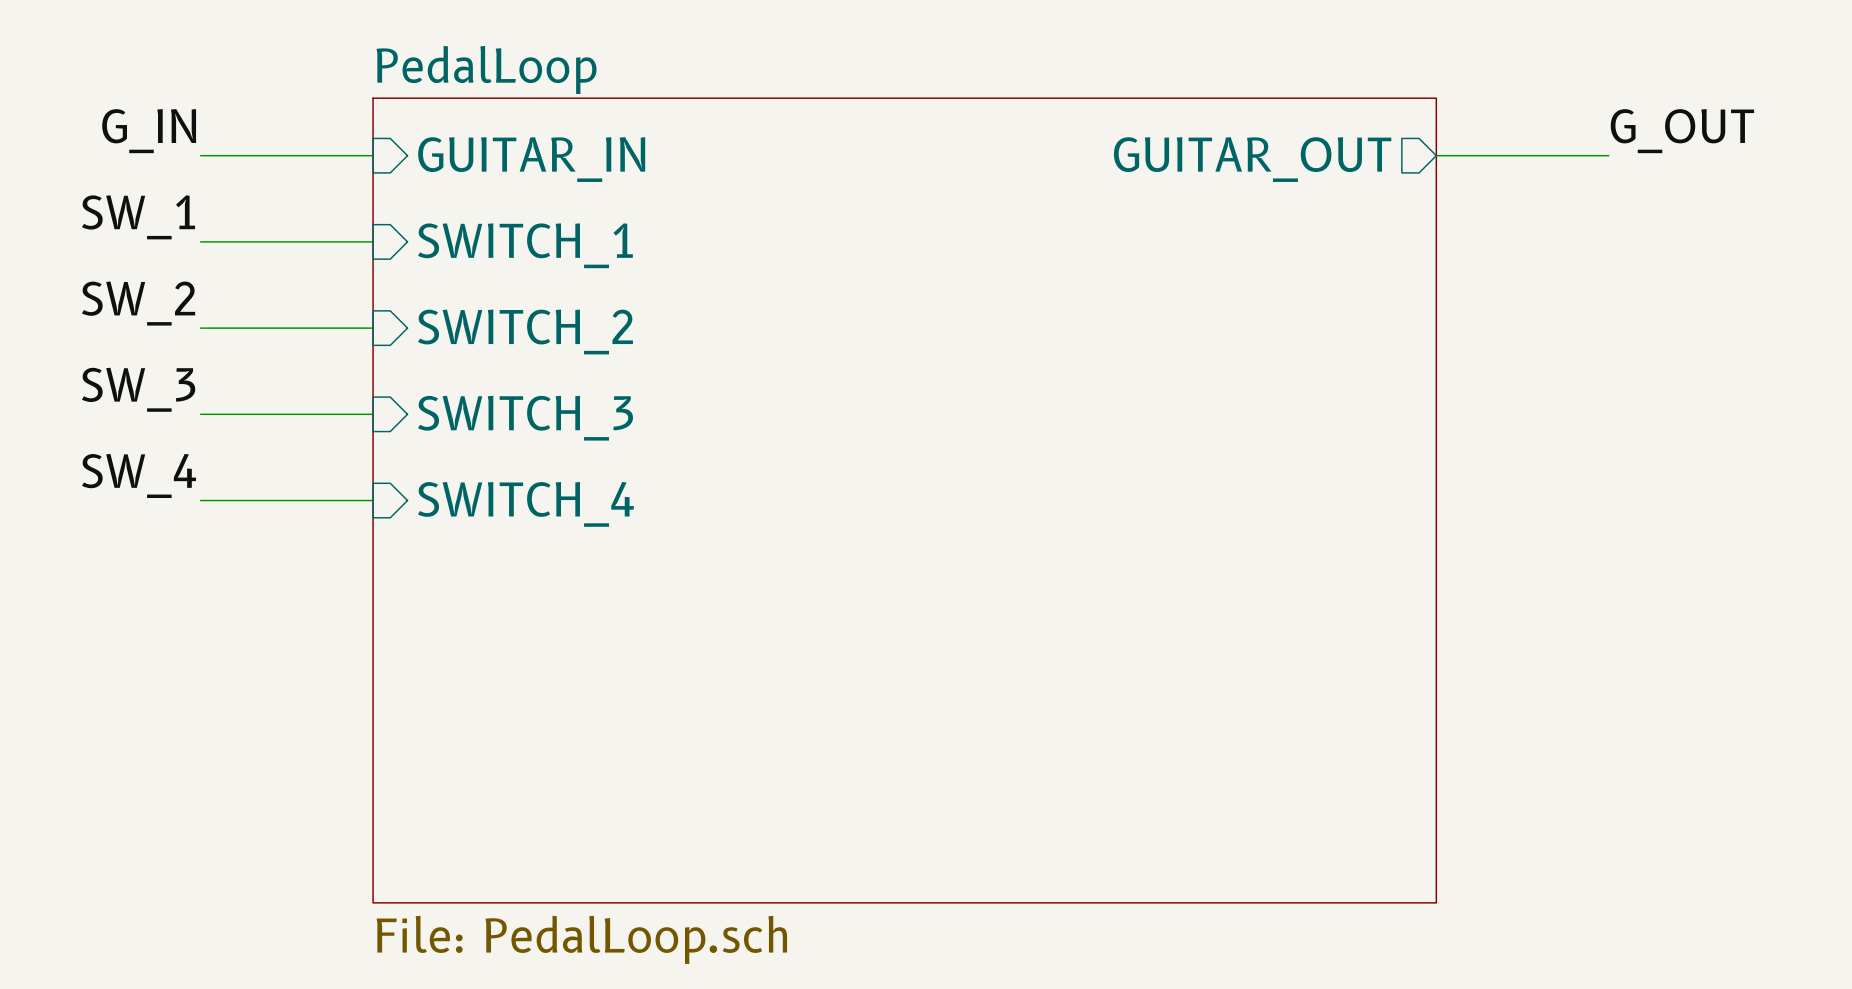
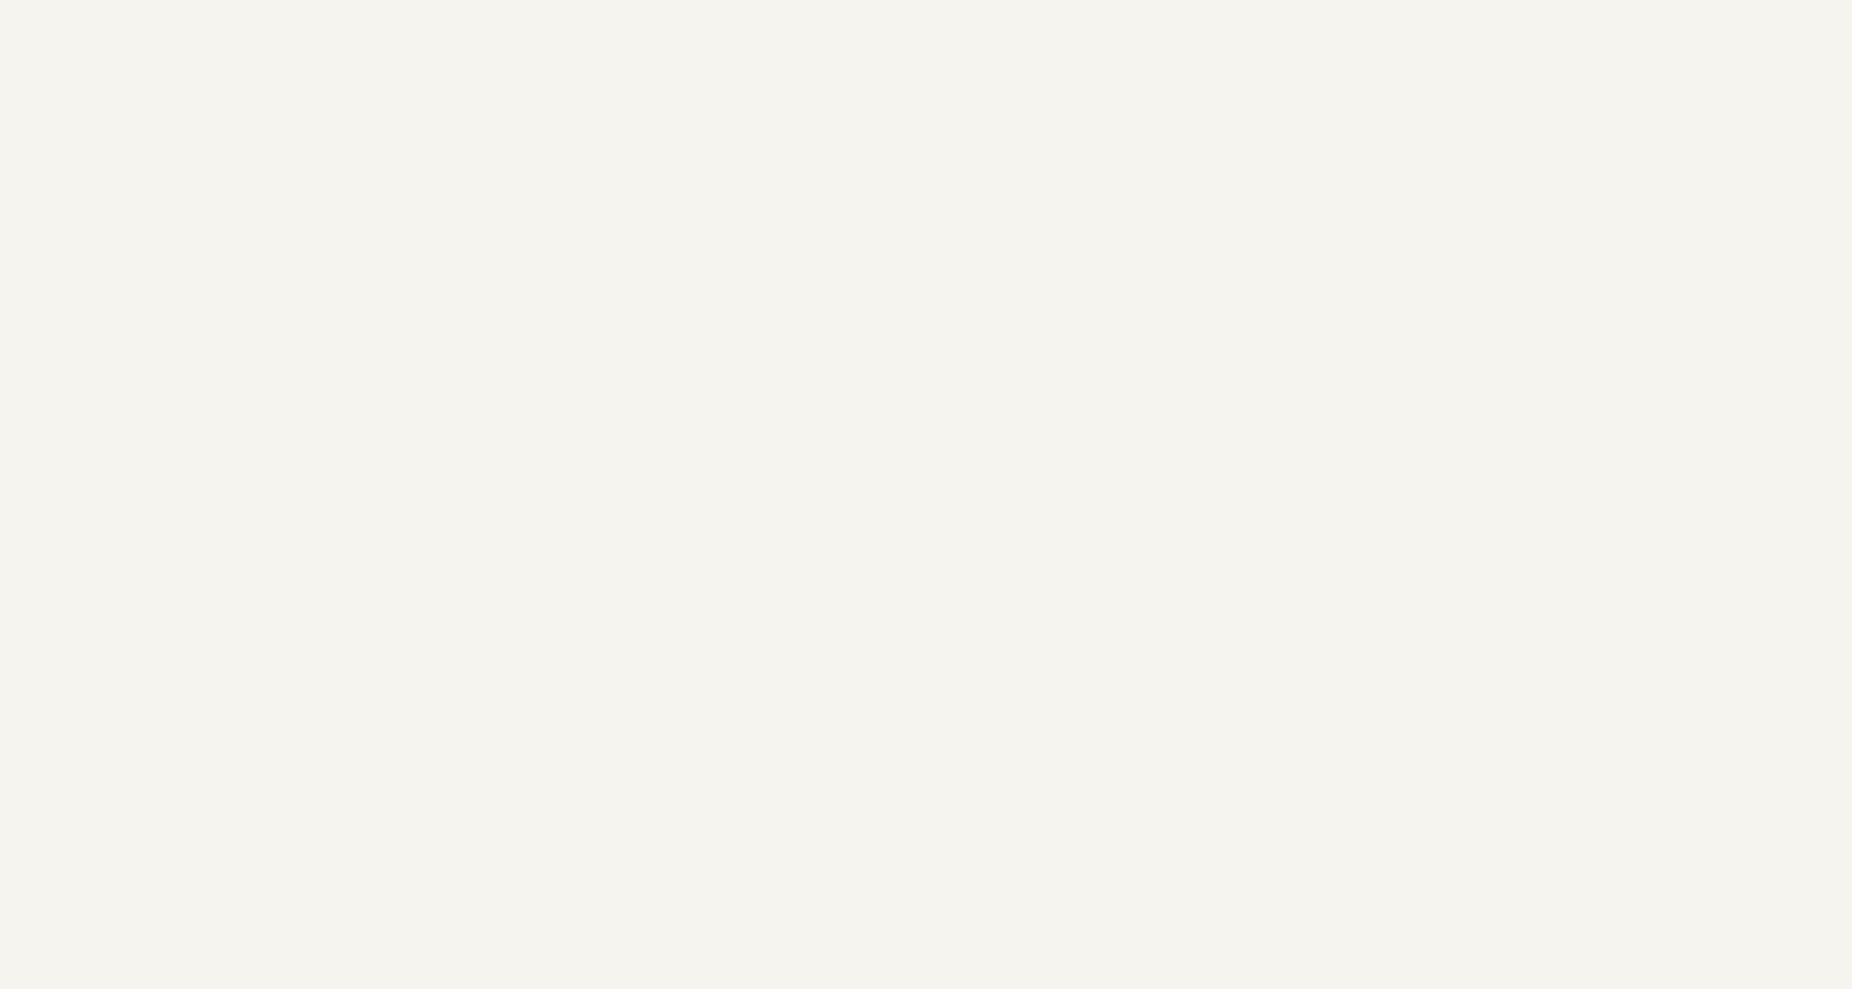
label: G_IN (149, 131) -> none
label: G_OUT (1682, 131) -> none
wire: (200, 155) (373, 155) -> none
wire: (1436, 155) (1608, 155) -> none
sheet pin: GUITAR_IN (531, 159) -> none
sheet pin: GUITAR_OUT (1252, 159) -> none
label: SW_1 (138, 217) -> none
wire: (200, 241) (373, 241) -> none
sheet pin: SWITCH_1 (525, 245) -> none
label: SW_2 (138, 303) -> none
wire: (200, 328) (373, 328) -> none
sheet pin: SWITCH_2 (525, 331) -> none
label: SW_3 (138, 389) -> none
wire: (200, 414) (373, 414) -> none
sheet pin: SWITCH_3 (525, 418) -> none
label: SW_4 (139, 475) -> none
wire: (200, 500) (373, 500) -> none
sheet PedalLoop: File: PedalLoop.sch (904, 500) -> none
sheet pin: SWITCH_4 (525, 504) -> none

